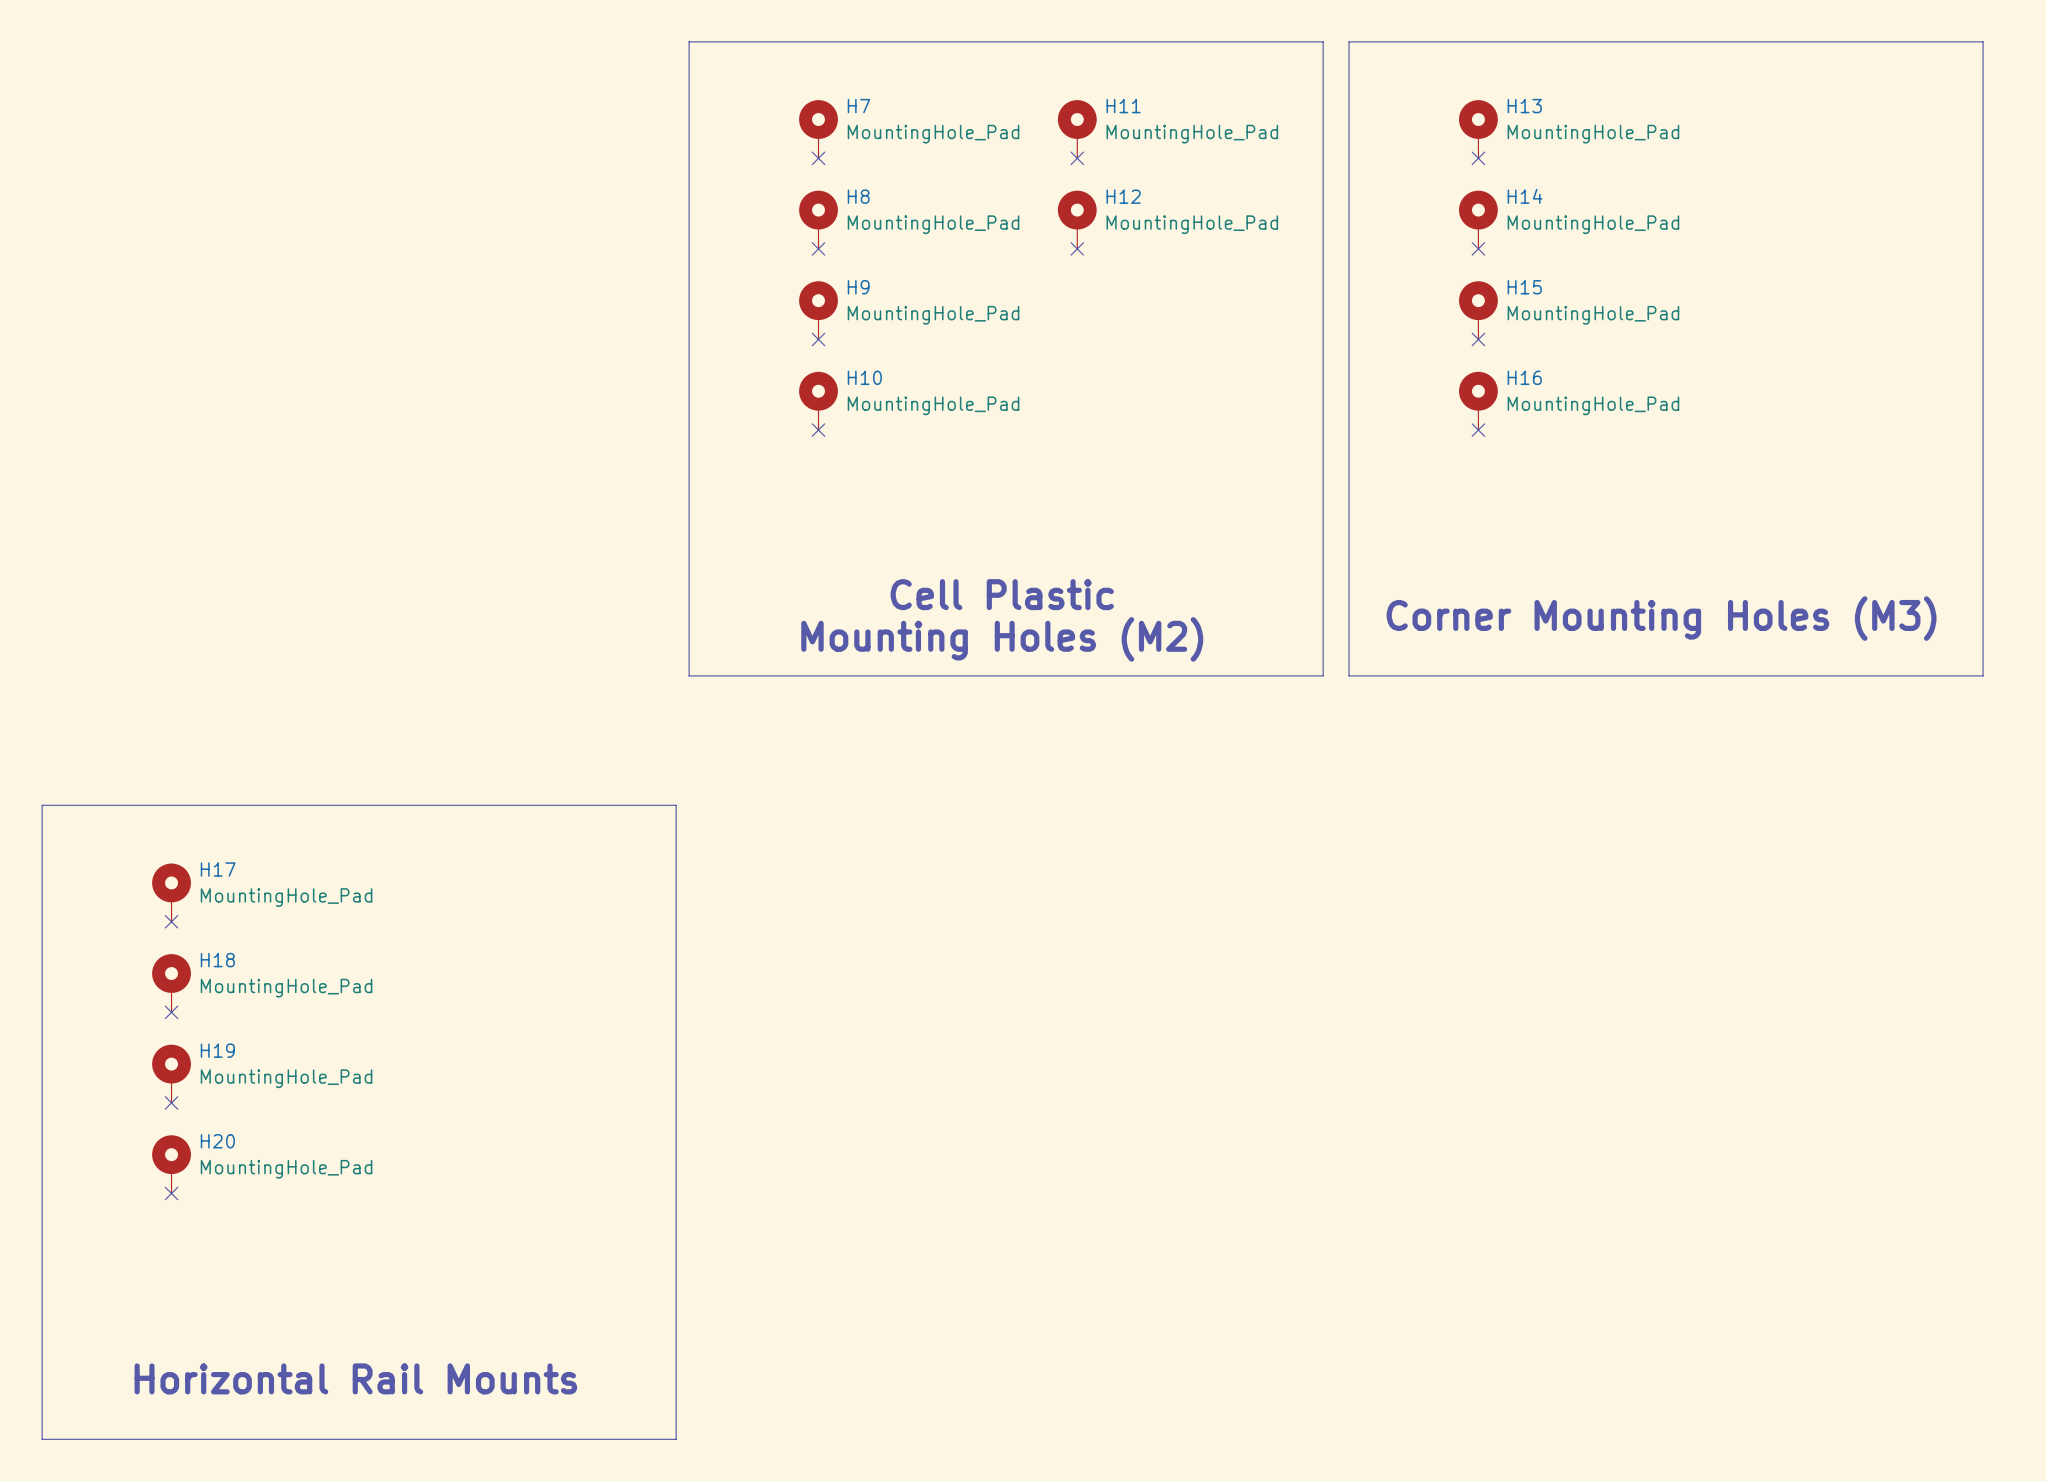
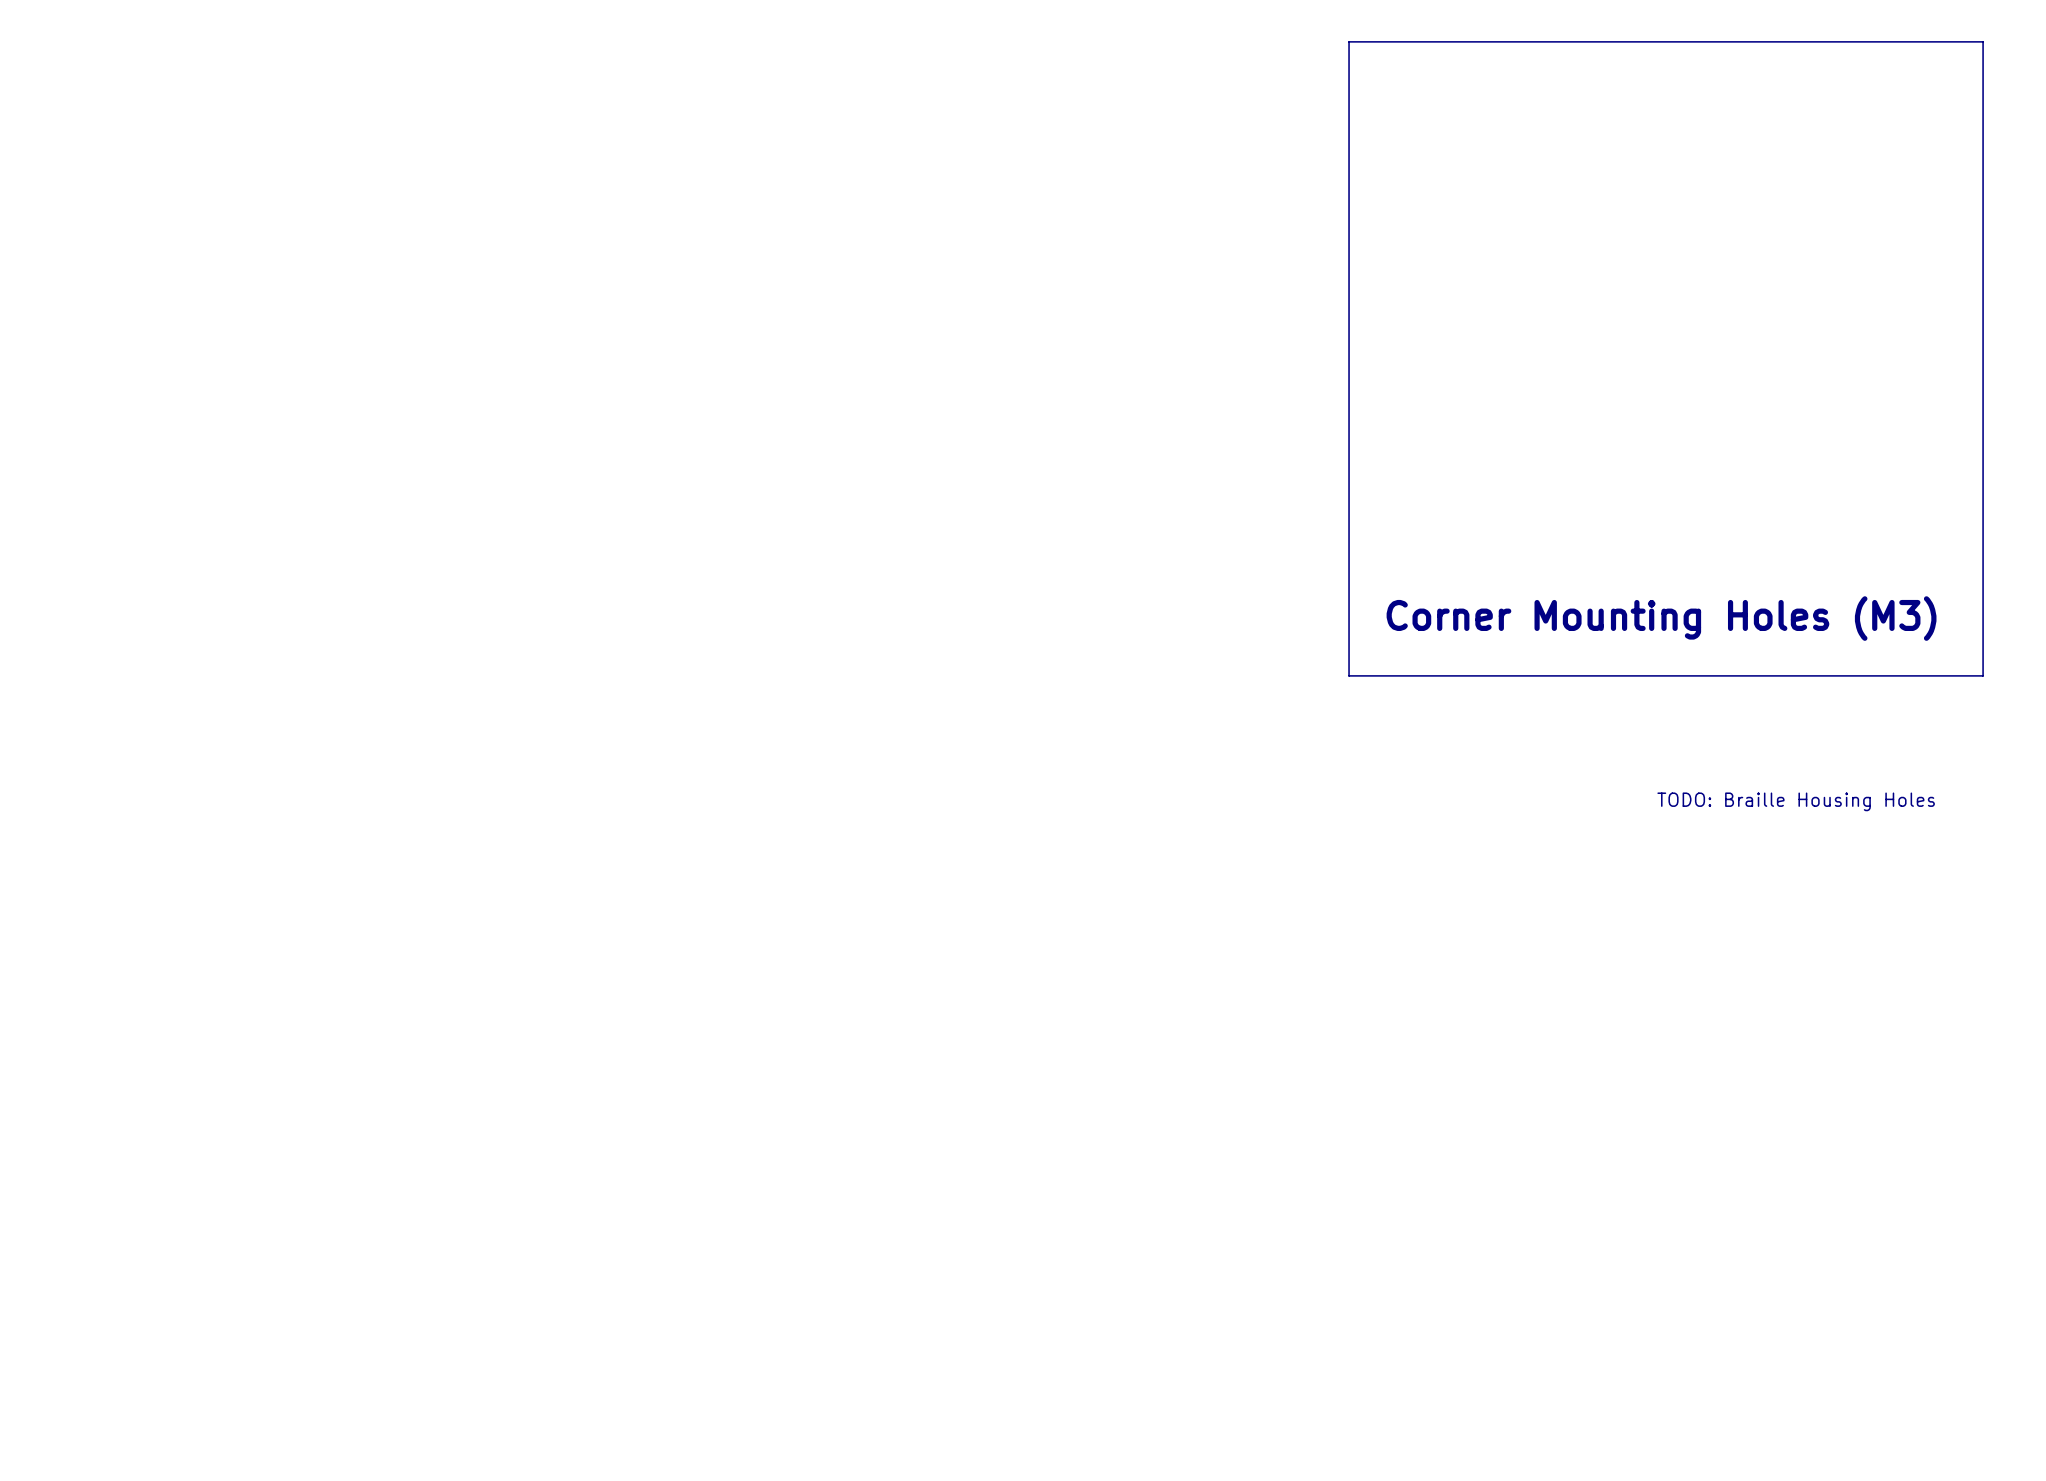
line: (689, 41) (1323, 41) (1323, 675) (689, 675) (689, 41) -> none
H7: MountingHole_Pad (818, 129) -> none
H11: MountingHole_Pad (1077, 129) -> none
H13: MountingHole_Pad (1478, 129) -> none
no-connect mark: (818, 158) -> none
no-connect mark: (1077, 158) -> none
no-connect mark: (1478, 158) -> none
H8: MountingHole_Pad (818, 219) -> none
H12: MountingHole_Pad (1077, 219) -> none
H14: MountingHole_Pad (1478, 219) -> none
no-connect mark: (818, 248) -> none
no-connect mark: (1077, 248) -> none
no-connect mark: (1478, 248) -> none
H9: MountingHole_Pad (818, 310) -> none
H15: MountingHole_Pad (1478, 310) -> none
no-connect mark: (818, 339) -> none
no-connect mark: (1478, 339) -> none
H10: MountingHole_Pad (818, 400) -> none
H16: MountingHole_Pad (1478, 400) -> none
no-connect mark: (818, 430) -> none
no-connect mark: (1478, 430) -> none
text: Cell Plastic (1002, 594) -> none
text: Mounting Holes (M2) (1002, 639) -> none
text: none -> TODO: Braille Housing Holes (1796, 801)
line: (42, 805) (676, 805) (676, 1439) (42, 1439) (42, 805) -> none
H17: MountingHole_Pad (171, 892) -> none
no-connect mark: (171, 921) -> none
H18: MountingHole_Pad (171, 983) -> none
no-connect mark: (171, 1012) -> none
H19: MountingHole_Pad (171, 1073) -> none
no-connect mark: (171, 1102) -> none
H20: MountingHole_Pad (171, 1164) -> none
no-connect mark: (171, 1193) -> none
text: Horizontal Rail Mounts (355, 1378) -> none

